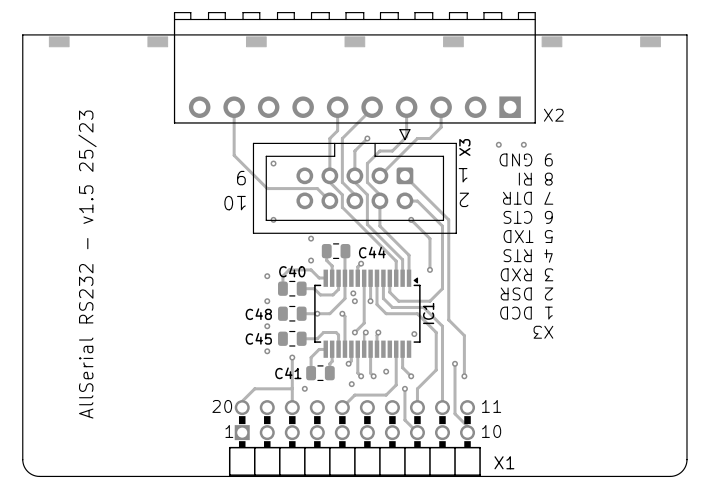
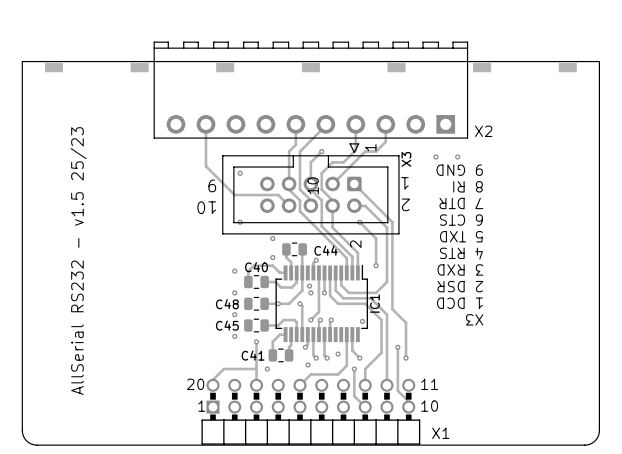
X3 text: none -> 1 (370, 147)
X3 text: none -> 10 (313, 185)
X3 text: none -> 2 (355, 244)
IC1 footprint: [314, 269, 421, 358] -> [275, 264, 368, 343]

